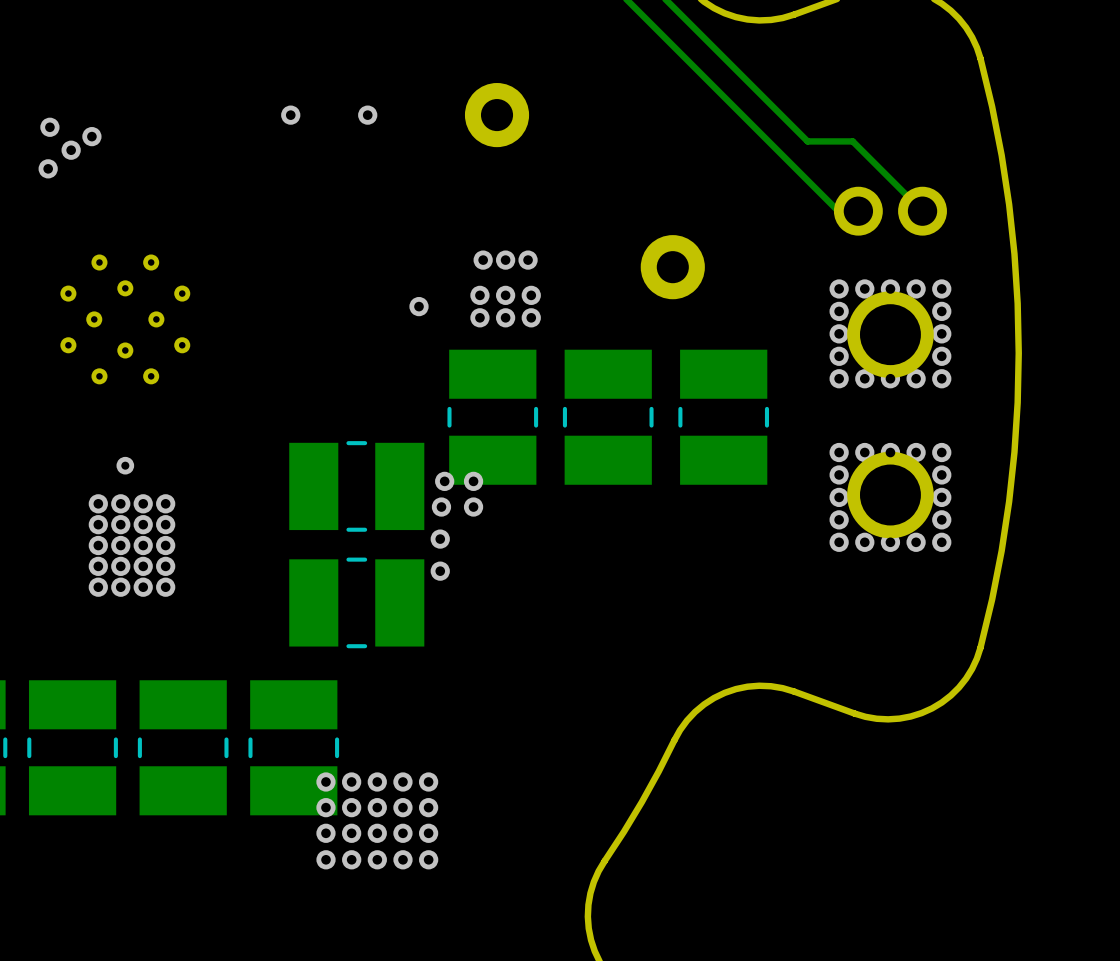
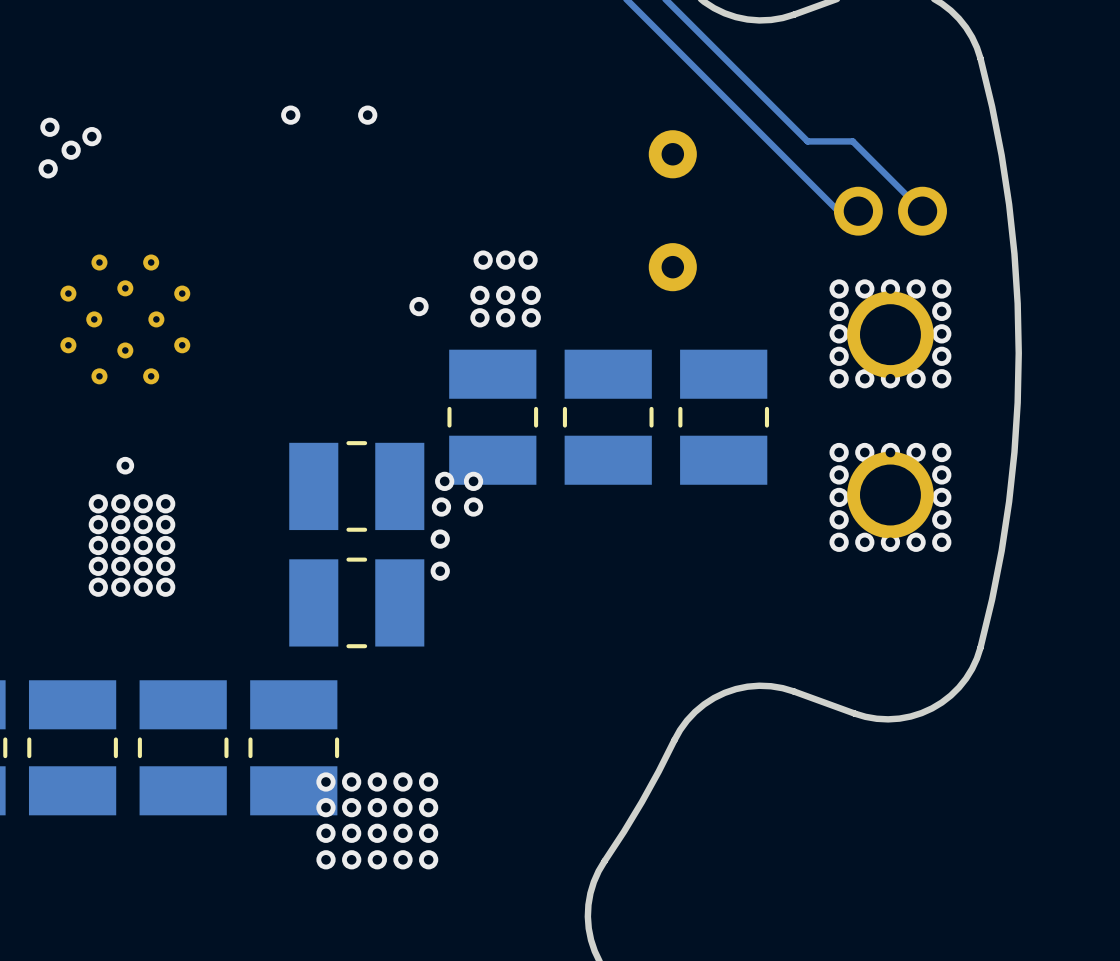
part: (497, 115) -> none
part: none -> (672, 154)
part footprint: [640, 235, 705, 300] -> [648, 243, 697, 292]

